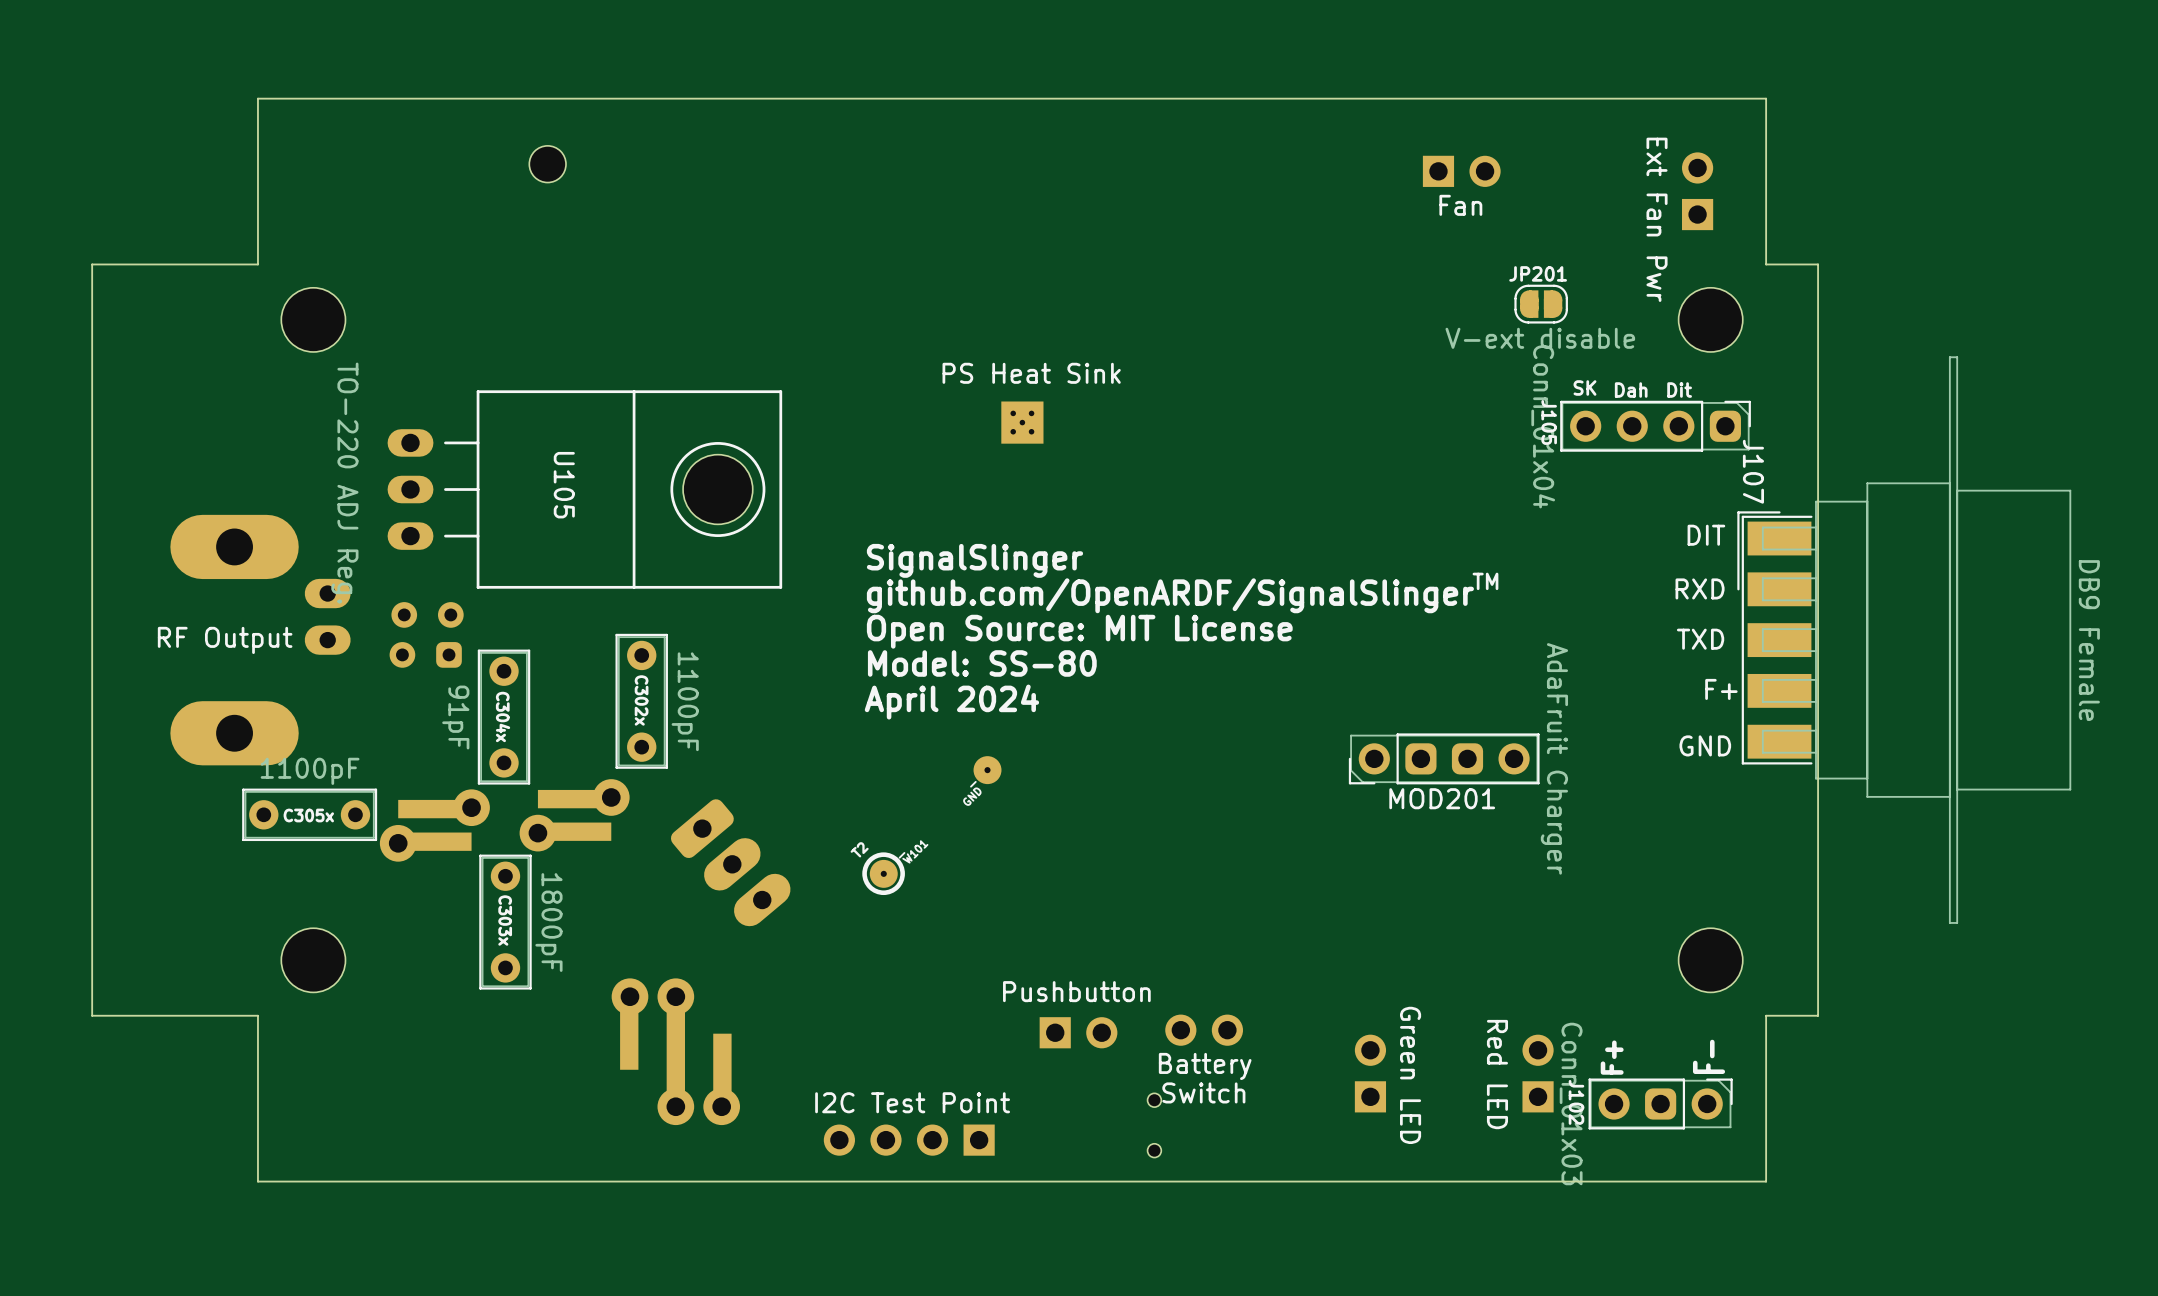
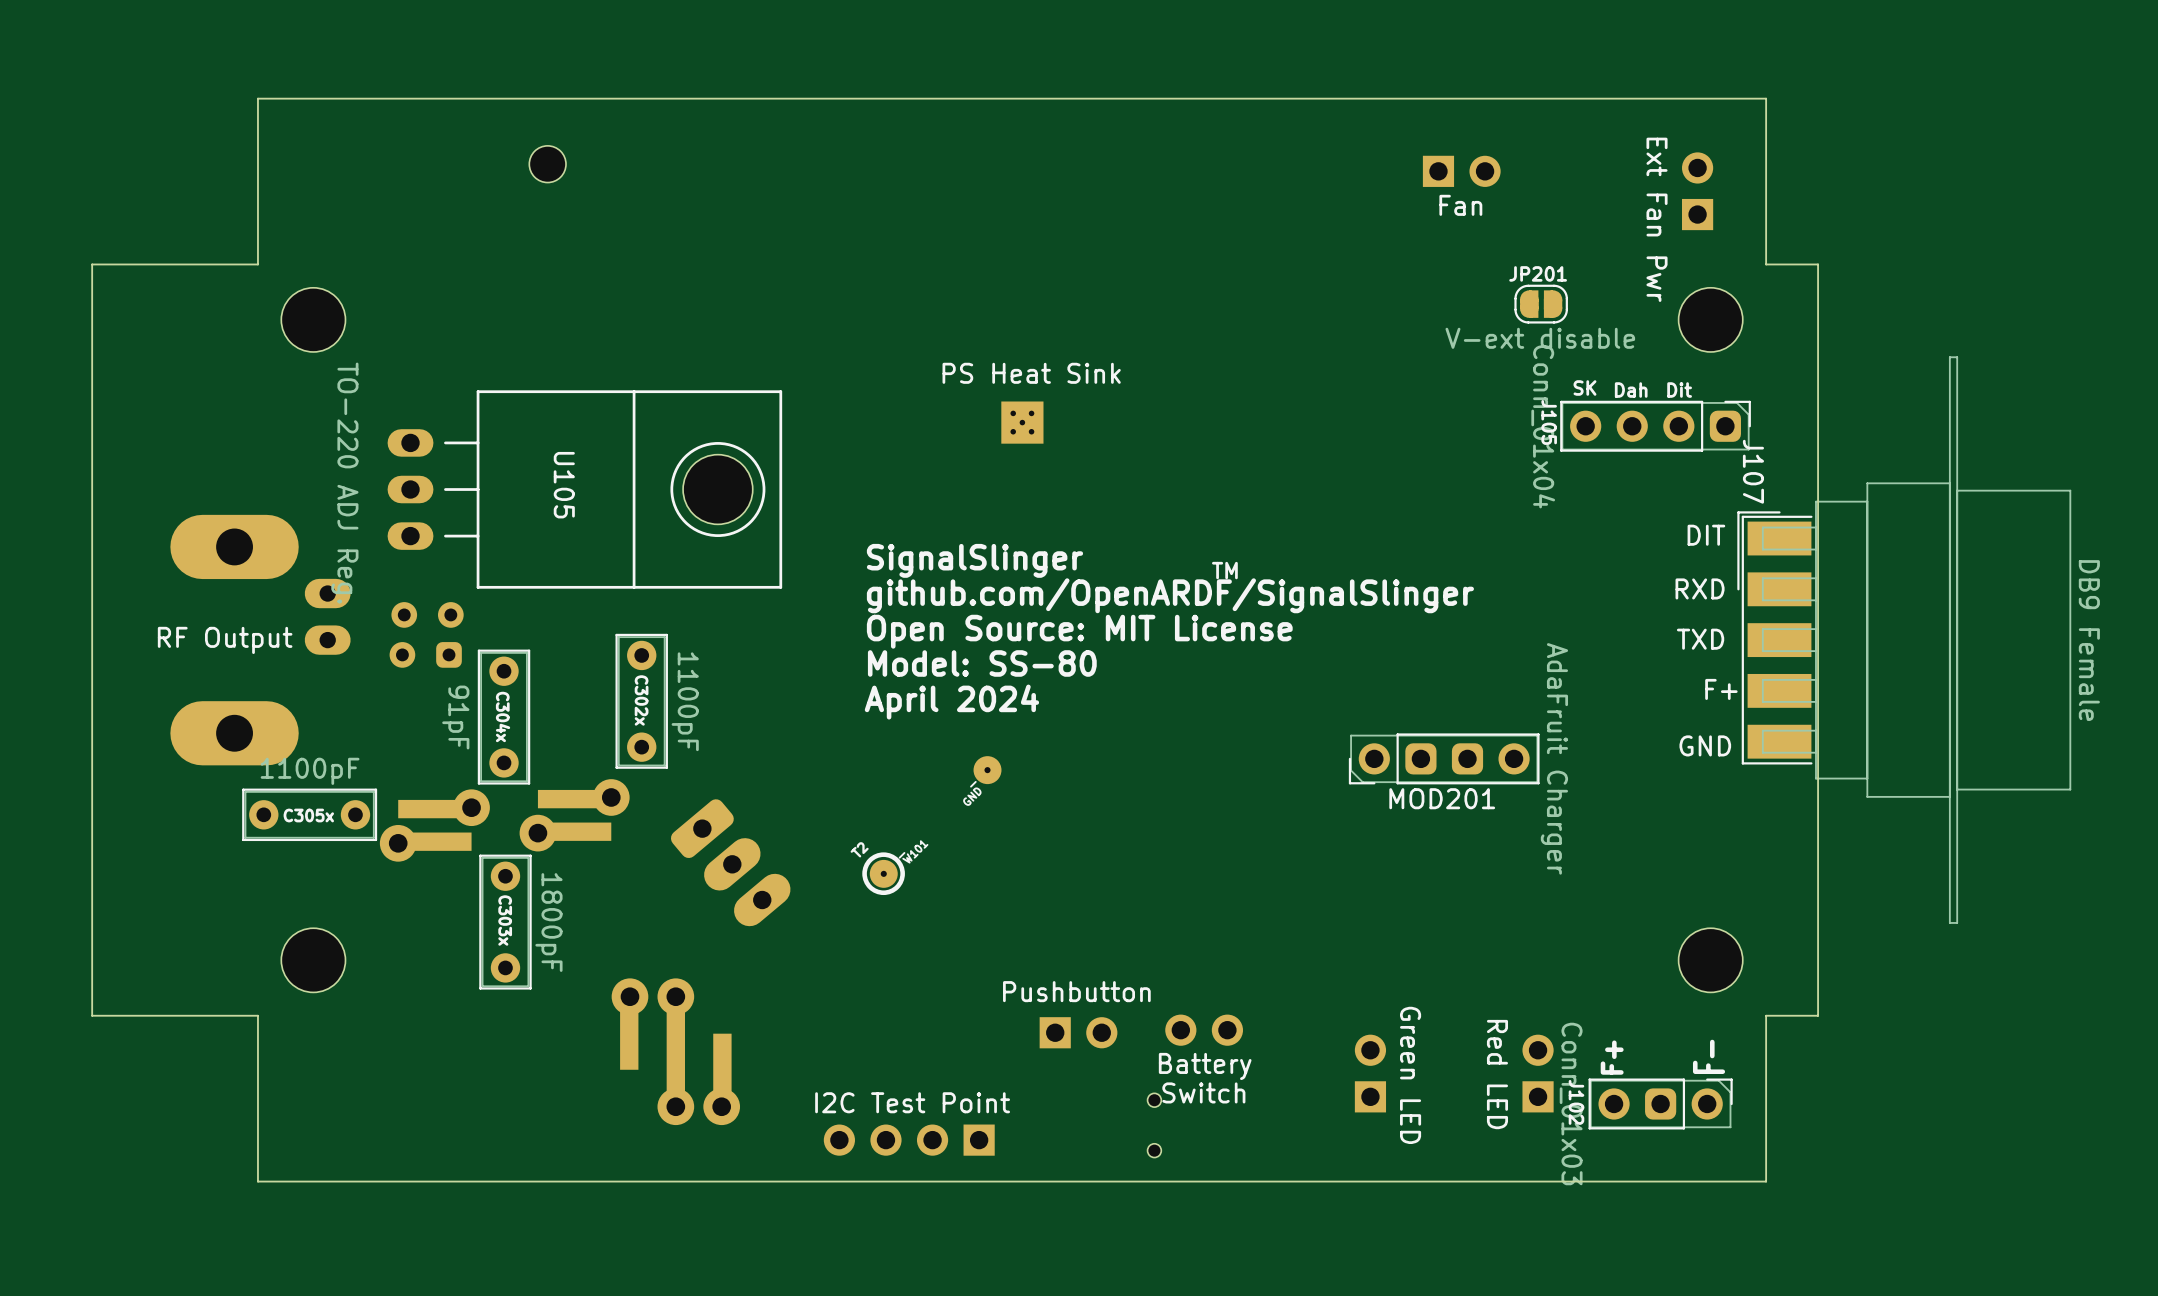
text position: TM (1485, 581) -> TM (1224, 570)

